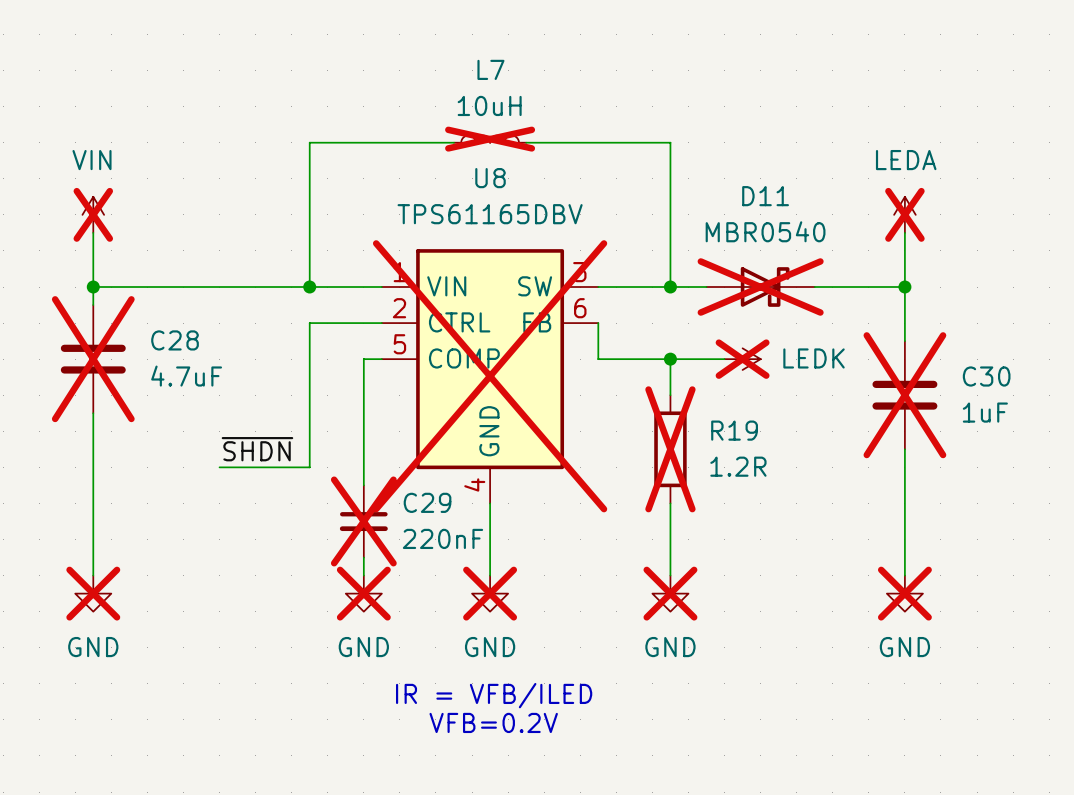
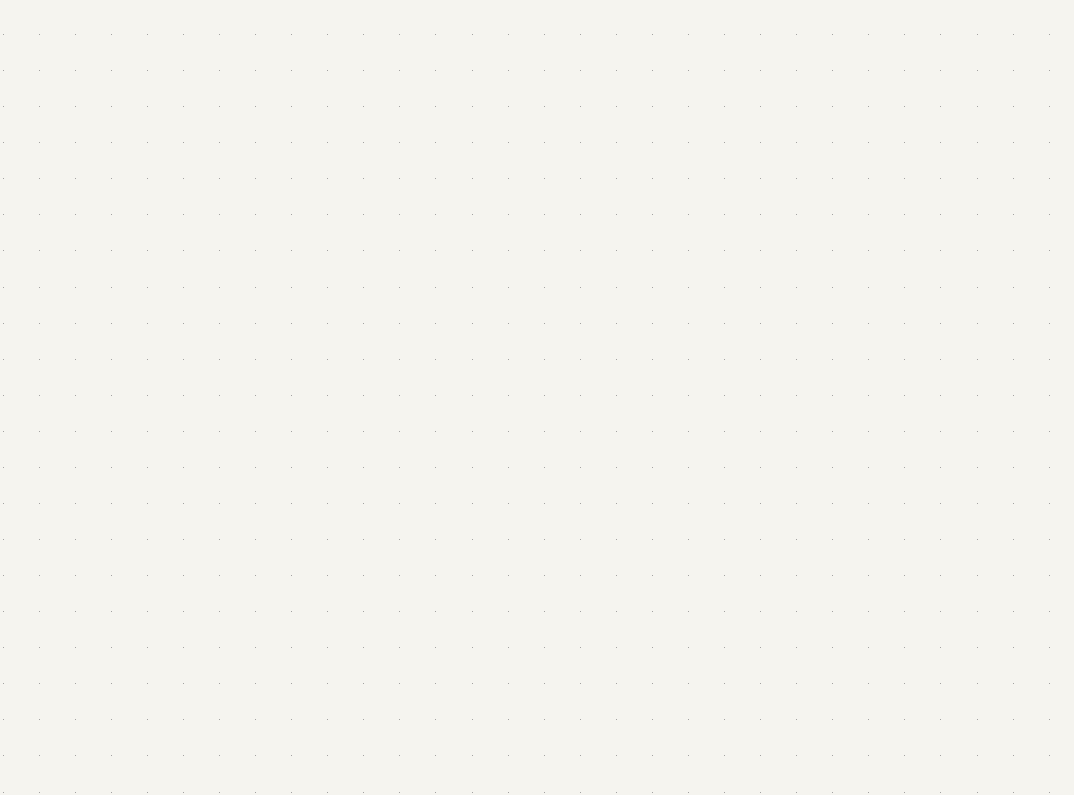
L7: 10uH (490, 139) -> none
wire: (454, 142) (309, 142) (309, 287) -> none
wire: (526, 142) (670, 142) (670, 287) -> none
power symbol: VIN (93, 214) -> none
power symbol: LEDA (904, 214) -> none
wire: (93, 232) (93, 305) -> none
wire: (904, 232) (904, 341) -> none
wire: (93, 287) (381, 287) -> none
junction: (93, 287) -> none
junction: (309, 287) -> none
wire: (598, 287) (706, 287) -> none
junction: (670, 287) -> none
D11: MBR0540 (760, 287) -> none
wire: (814, 287) (904, 287) -> none
junction: (904, 287) -> none
wire: (381, 323) (309, 323) (309, 467) (219, 467) -> none
wire: (598, 323) (598, 359) (724, 359) -> none
C28: 4.7uF (93, 359) -> none
wire: (381, 359) (363, 359) (363, 485) -> none
wire: (670, 359) (670, 395) -> none
junction: (670, 359) -> none
power symbol: LEDK (742, 359) -> none
U8: TPS61165DBV (490, 376) -> none
C30: 1uF (904, 395) -> none
wire: (93, 413) (93, 575) -> none
label: ~{SHDN} (257, 449) -> none
R19: 1.2R (670, 449) -> none
wire: (904, 449) (904, 575) -> none
wire: (490, 503) (490, 575) -> none
wire: (670, 503) (670, 575) -> none
C29: 220nF (363, 521) -> none
wire: (363, 557) (363, 575) -> none
power symbol: GND (93, 593) -> none
power symbol: GND (363, 593) -> none
power symbol: GND (490, 593) -> none
power symbol: GND (670, 593) -> none
power symbol: GND (904, 593) -> none
text: IR = VFB/ILED (494, 695) -> none
text: VFB=0.2V (493, 722) -> none

